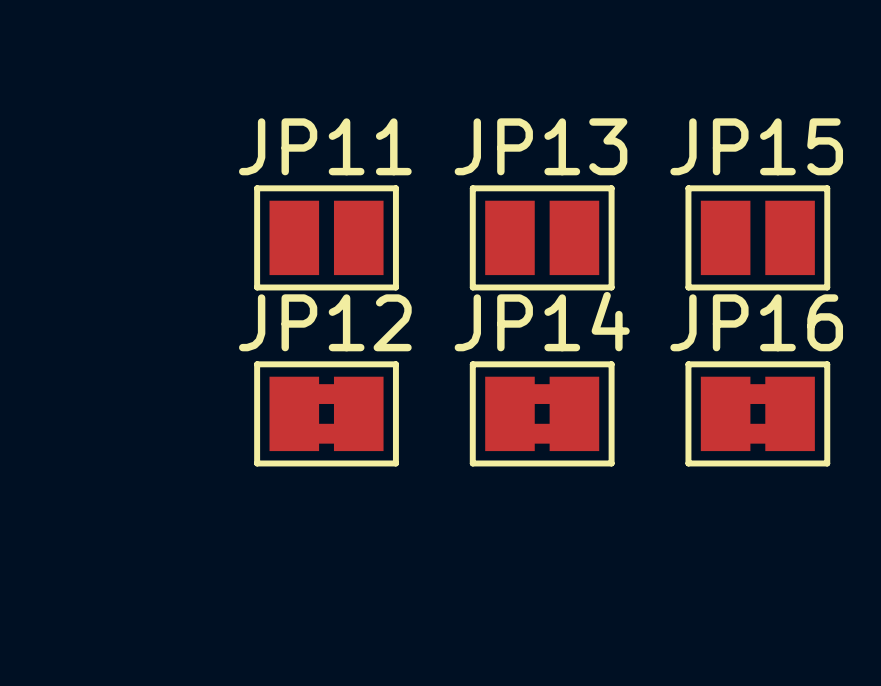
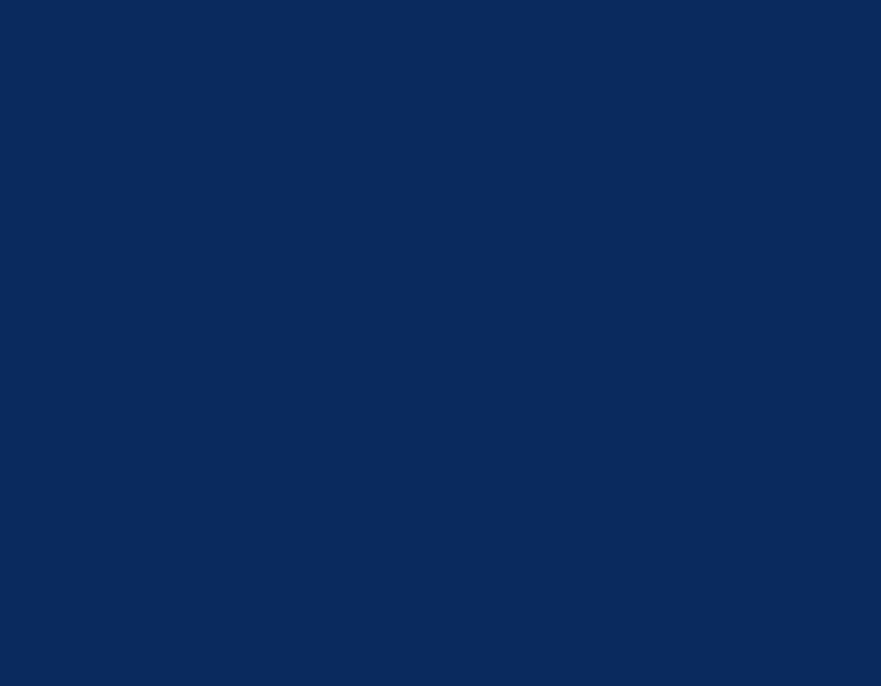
JP11: (326, 237) -> none
JP13: (542, 237) -> none
JP15: (757, 237) -> none
JP12: (326, 413) -> none
JP14: (542, 413) -> none
JP16: (757, 413) -> none

